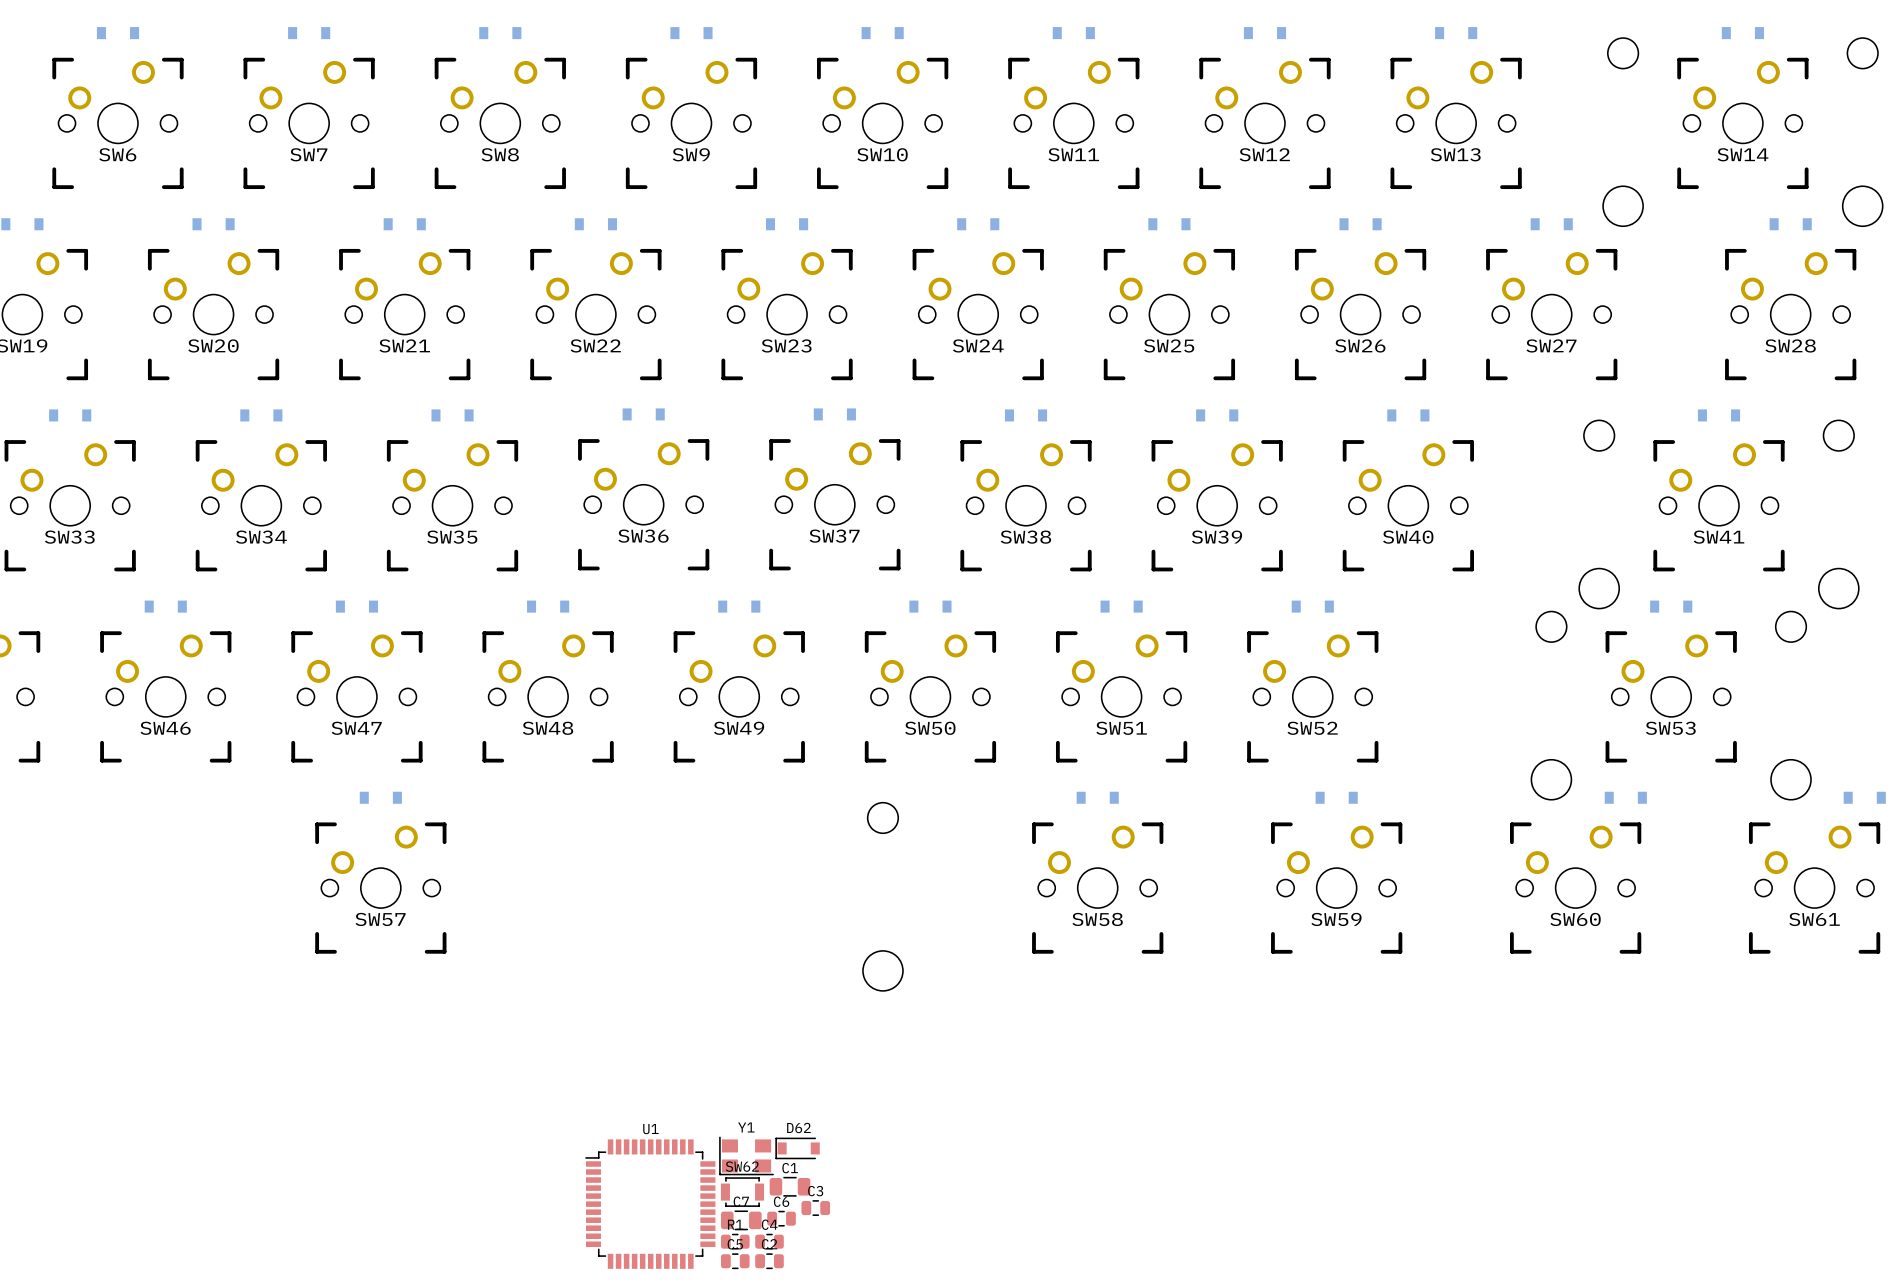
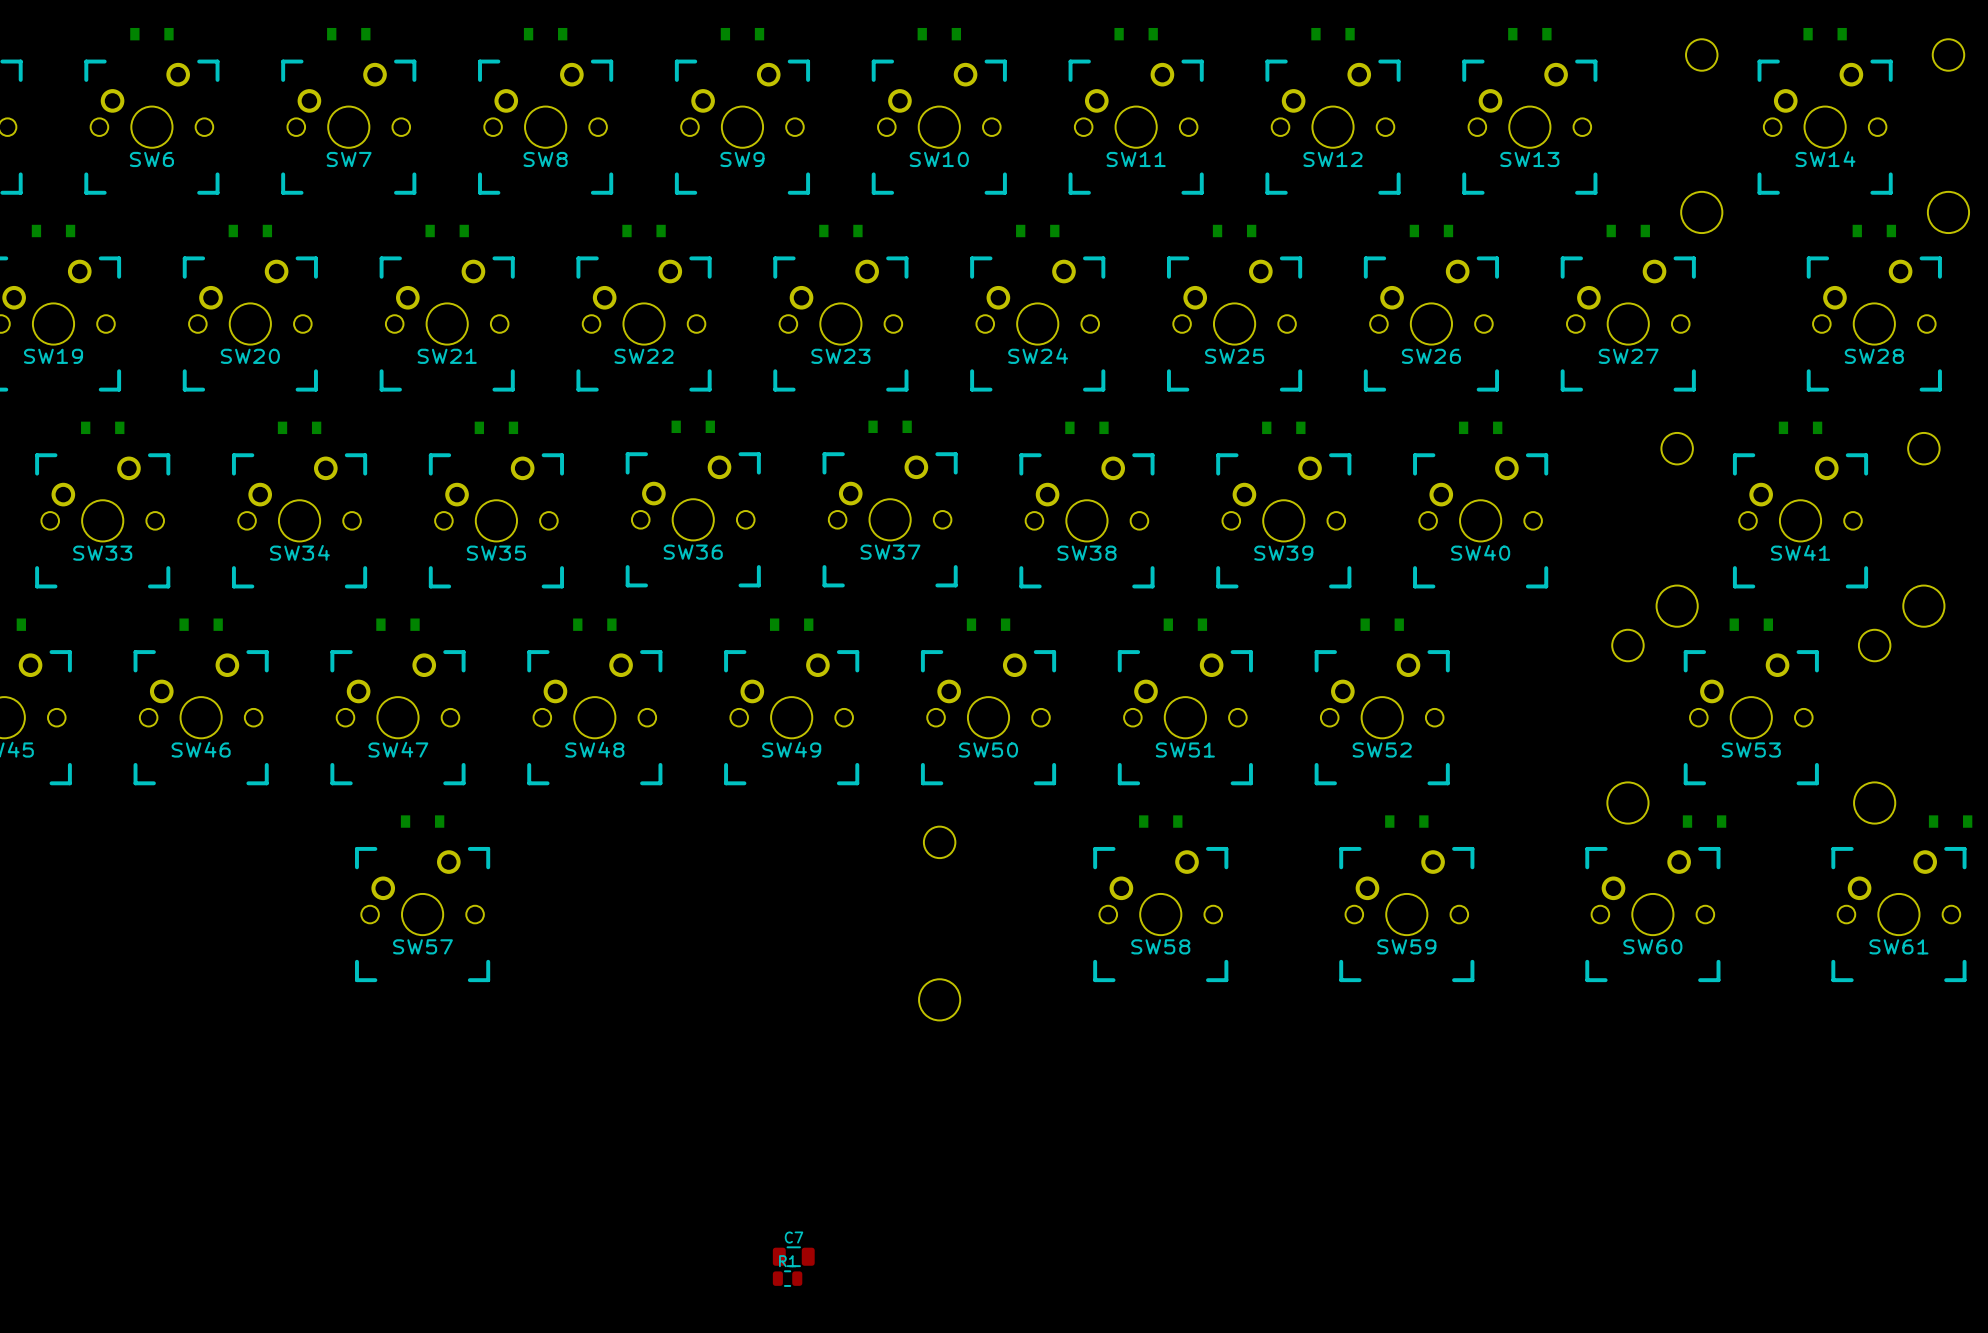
D62: (797, 1148) -> none
Y1: (746, 1155) -> none
C1: (789, 1186) -> none
SW62: (742, 1192) -> none
U1: (650, 1204) -> none
C3: (815, 1208) -> none
C6: (781, 1218) -> none
C4: (769, 1241) -> none
C5: (735, 1261) -> none
C2: (769, 1261) -> none

